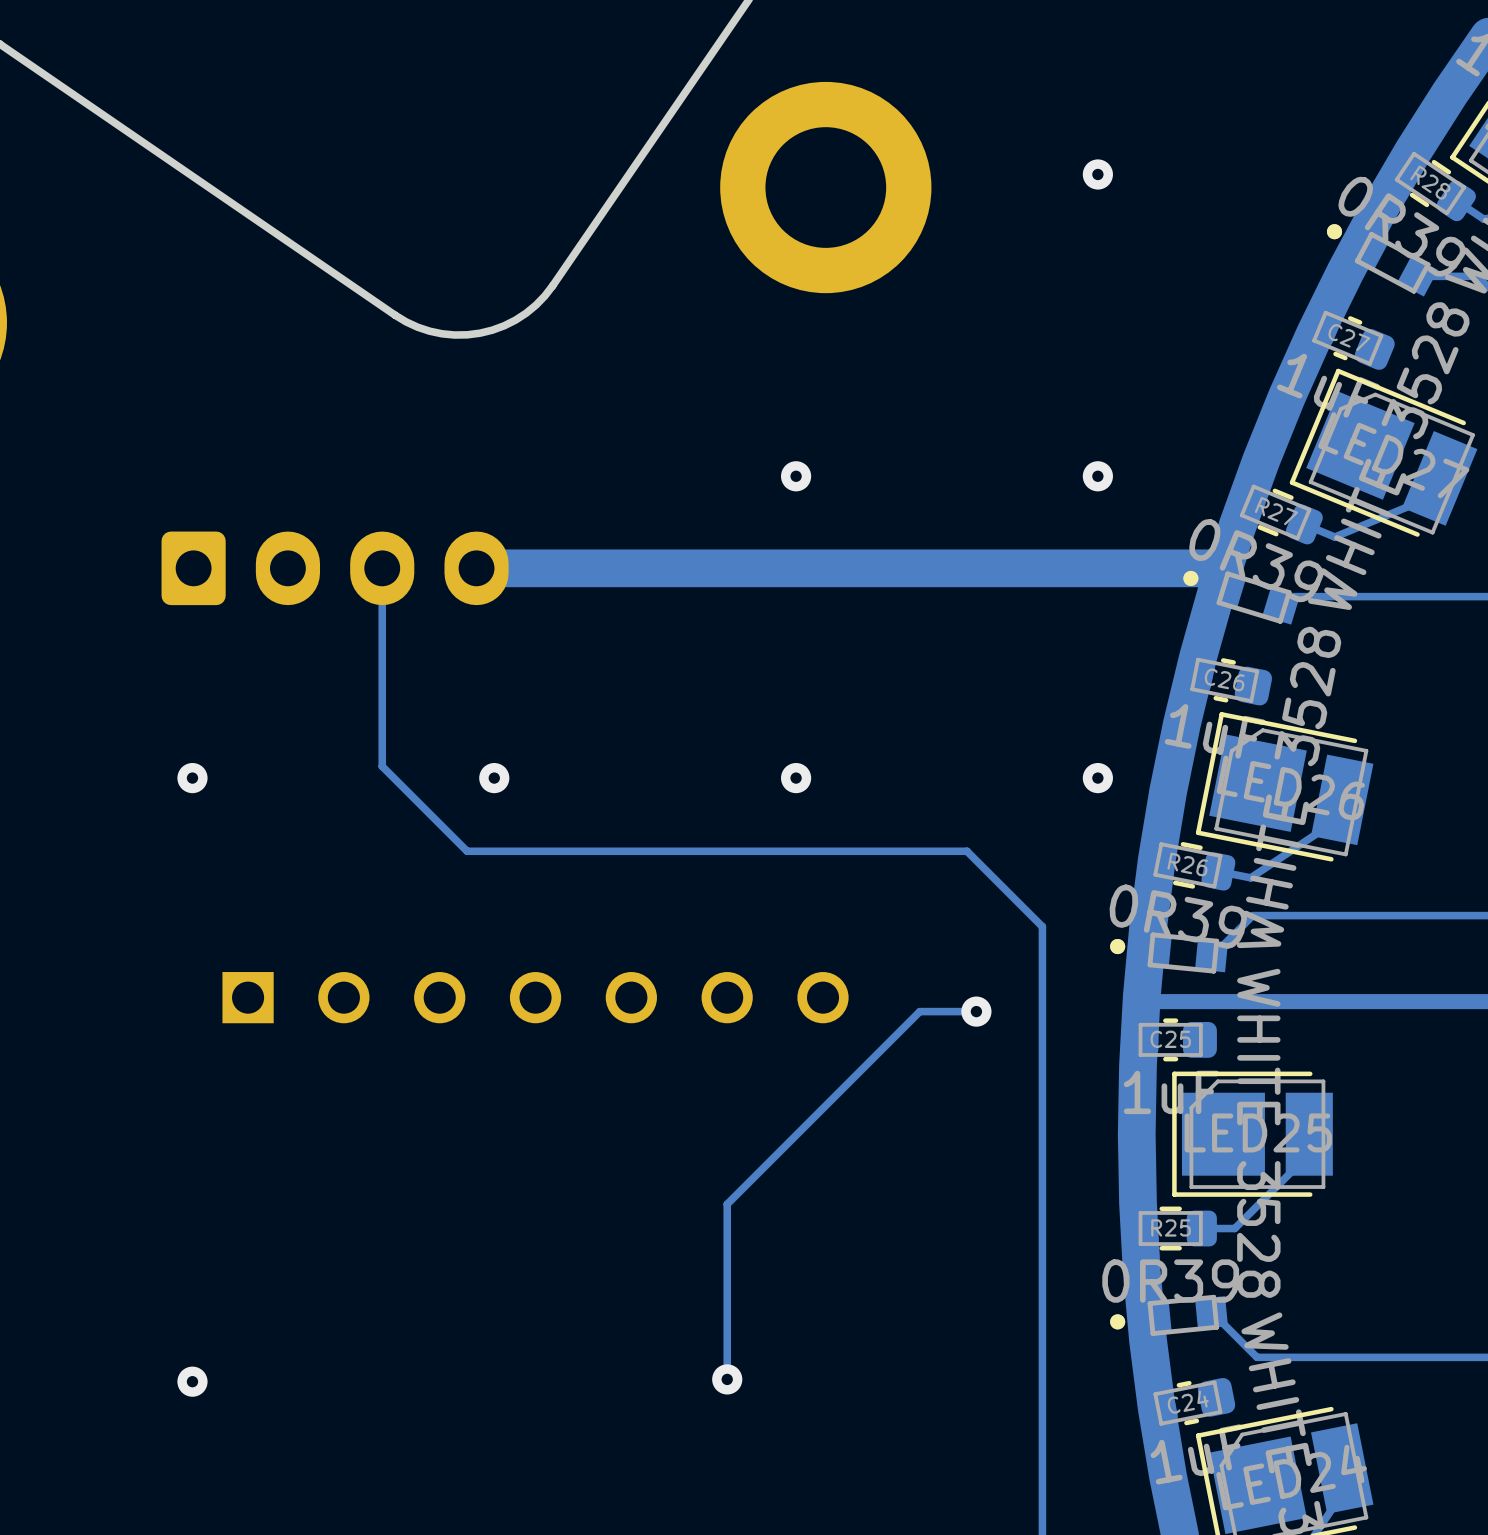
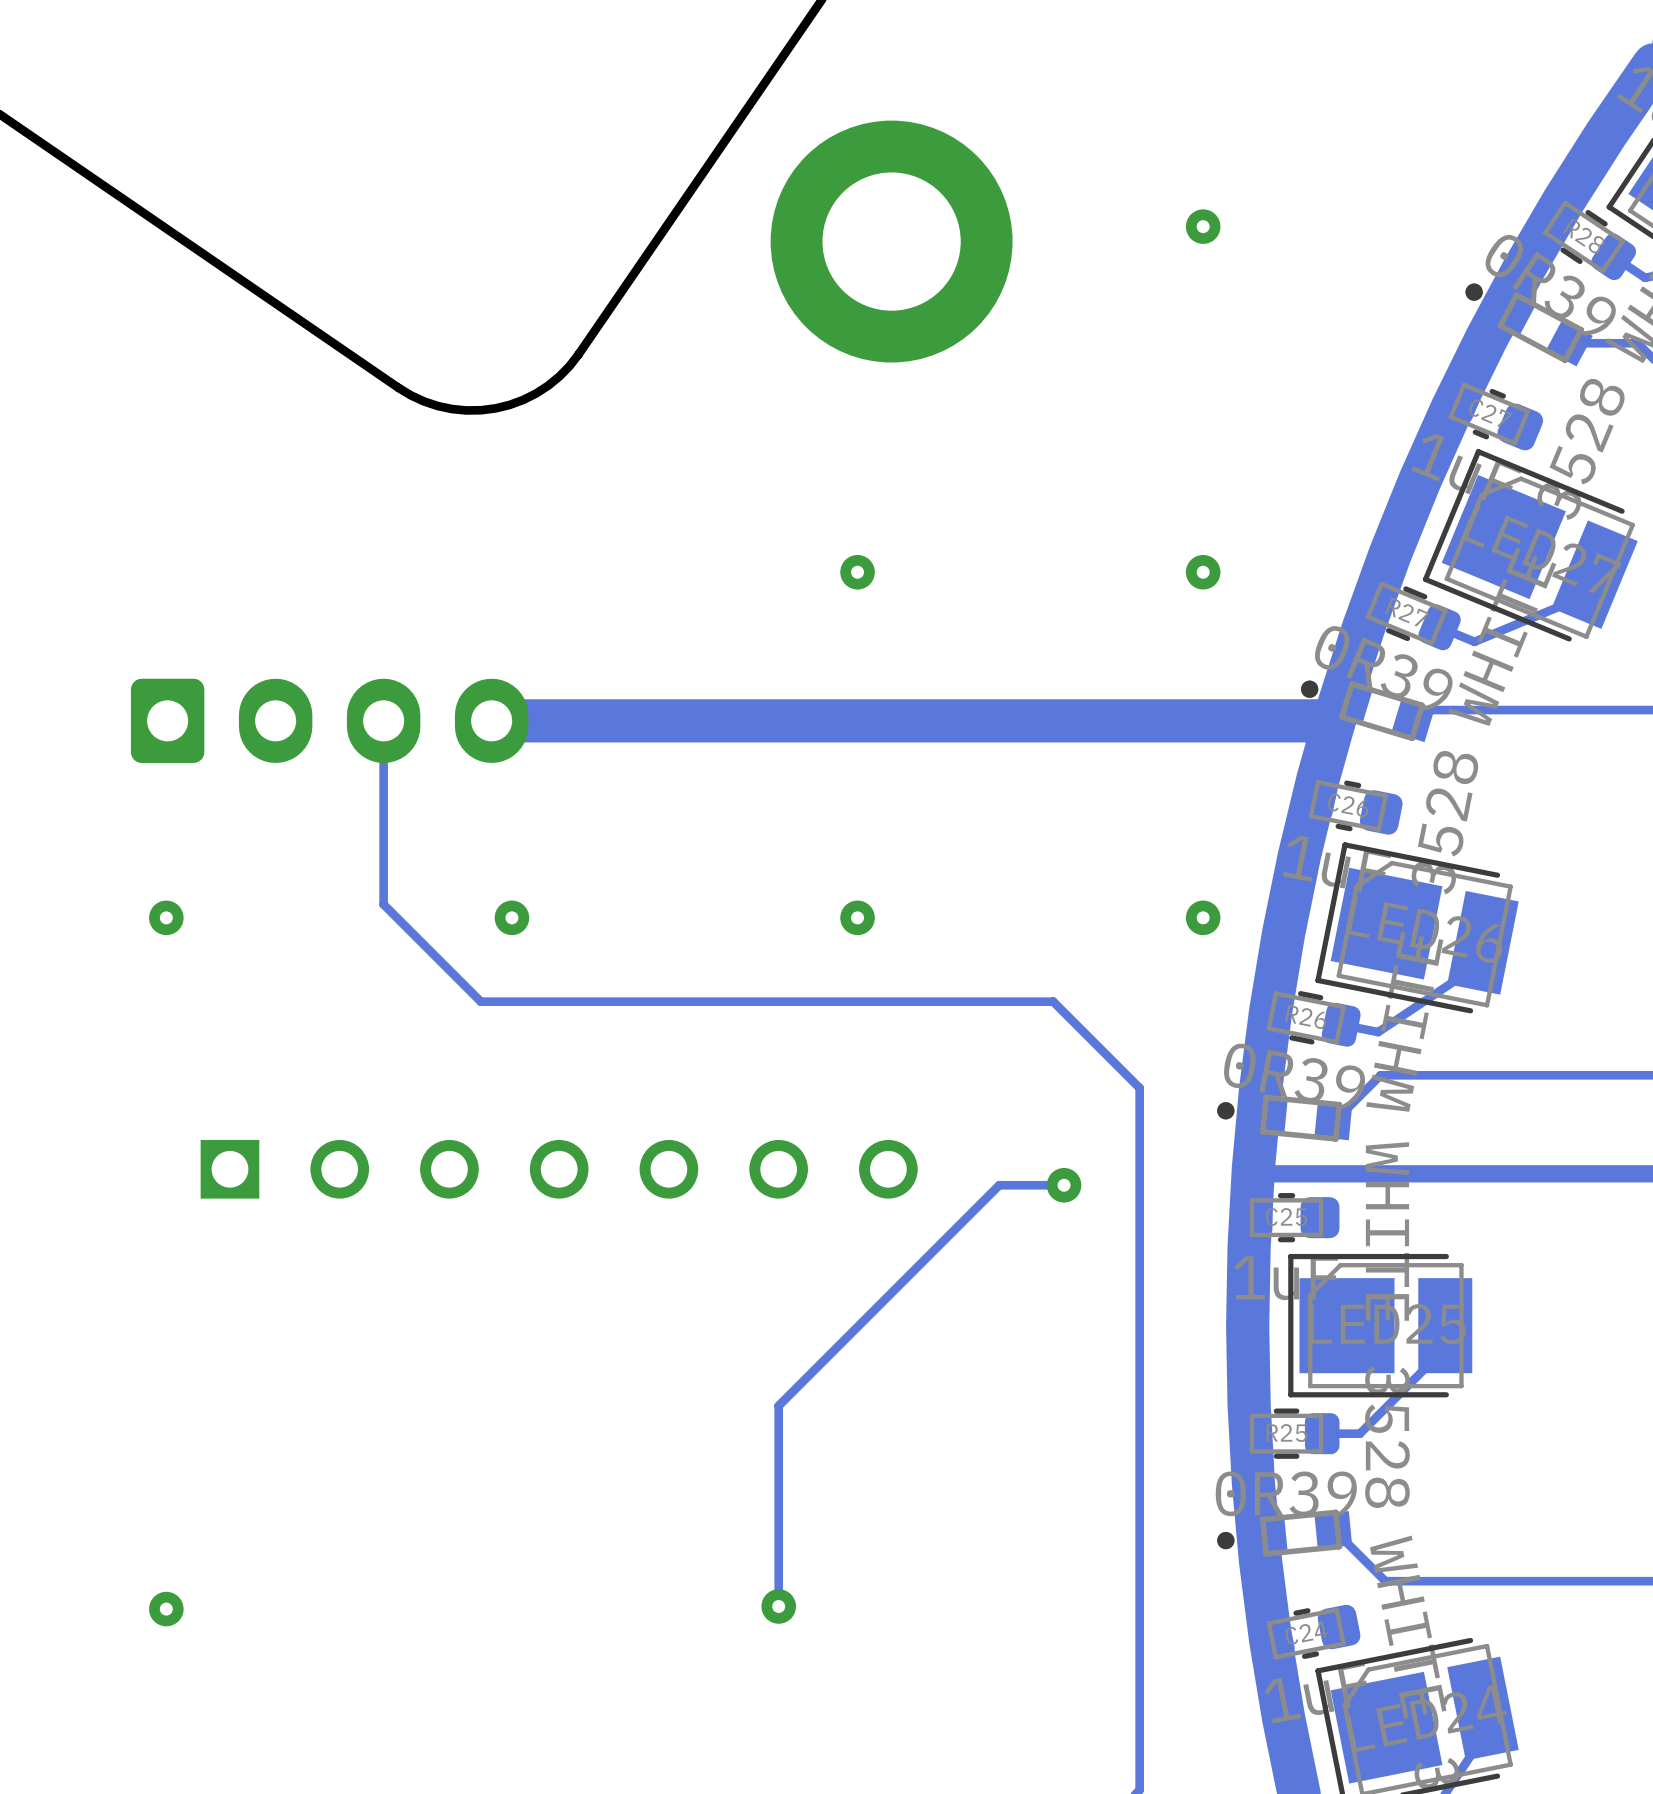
part position: (335, 568) -> (329, 720)
track: (1221, 568) (476, 568) -> none
track: none -> (1334, 720) (491, 720)

